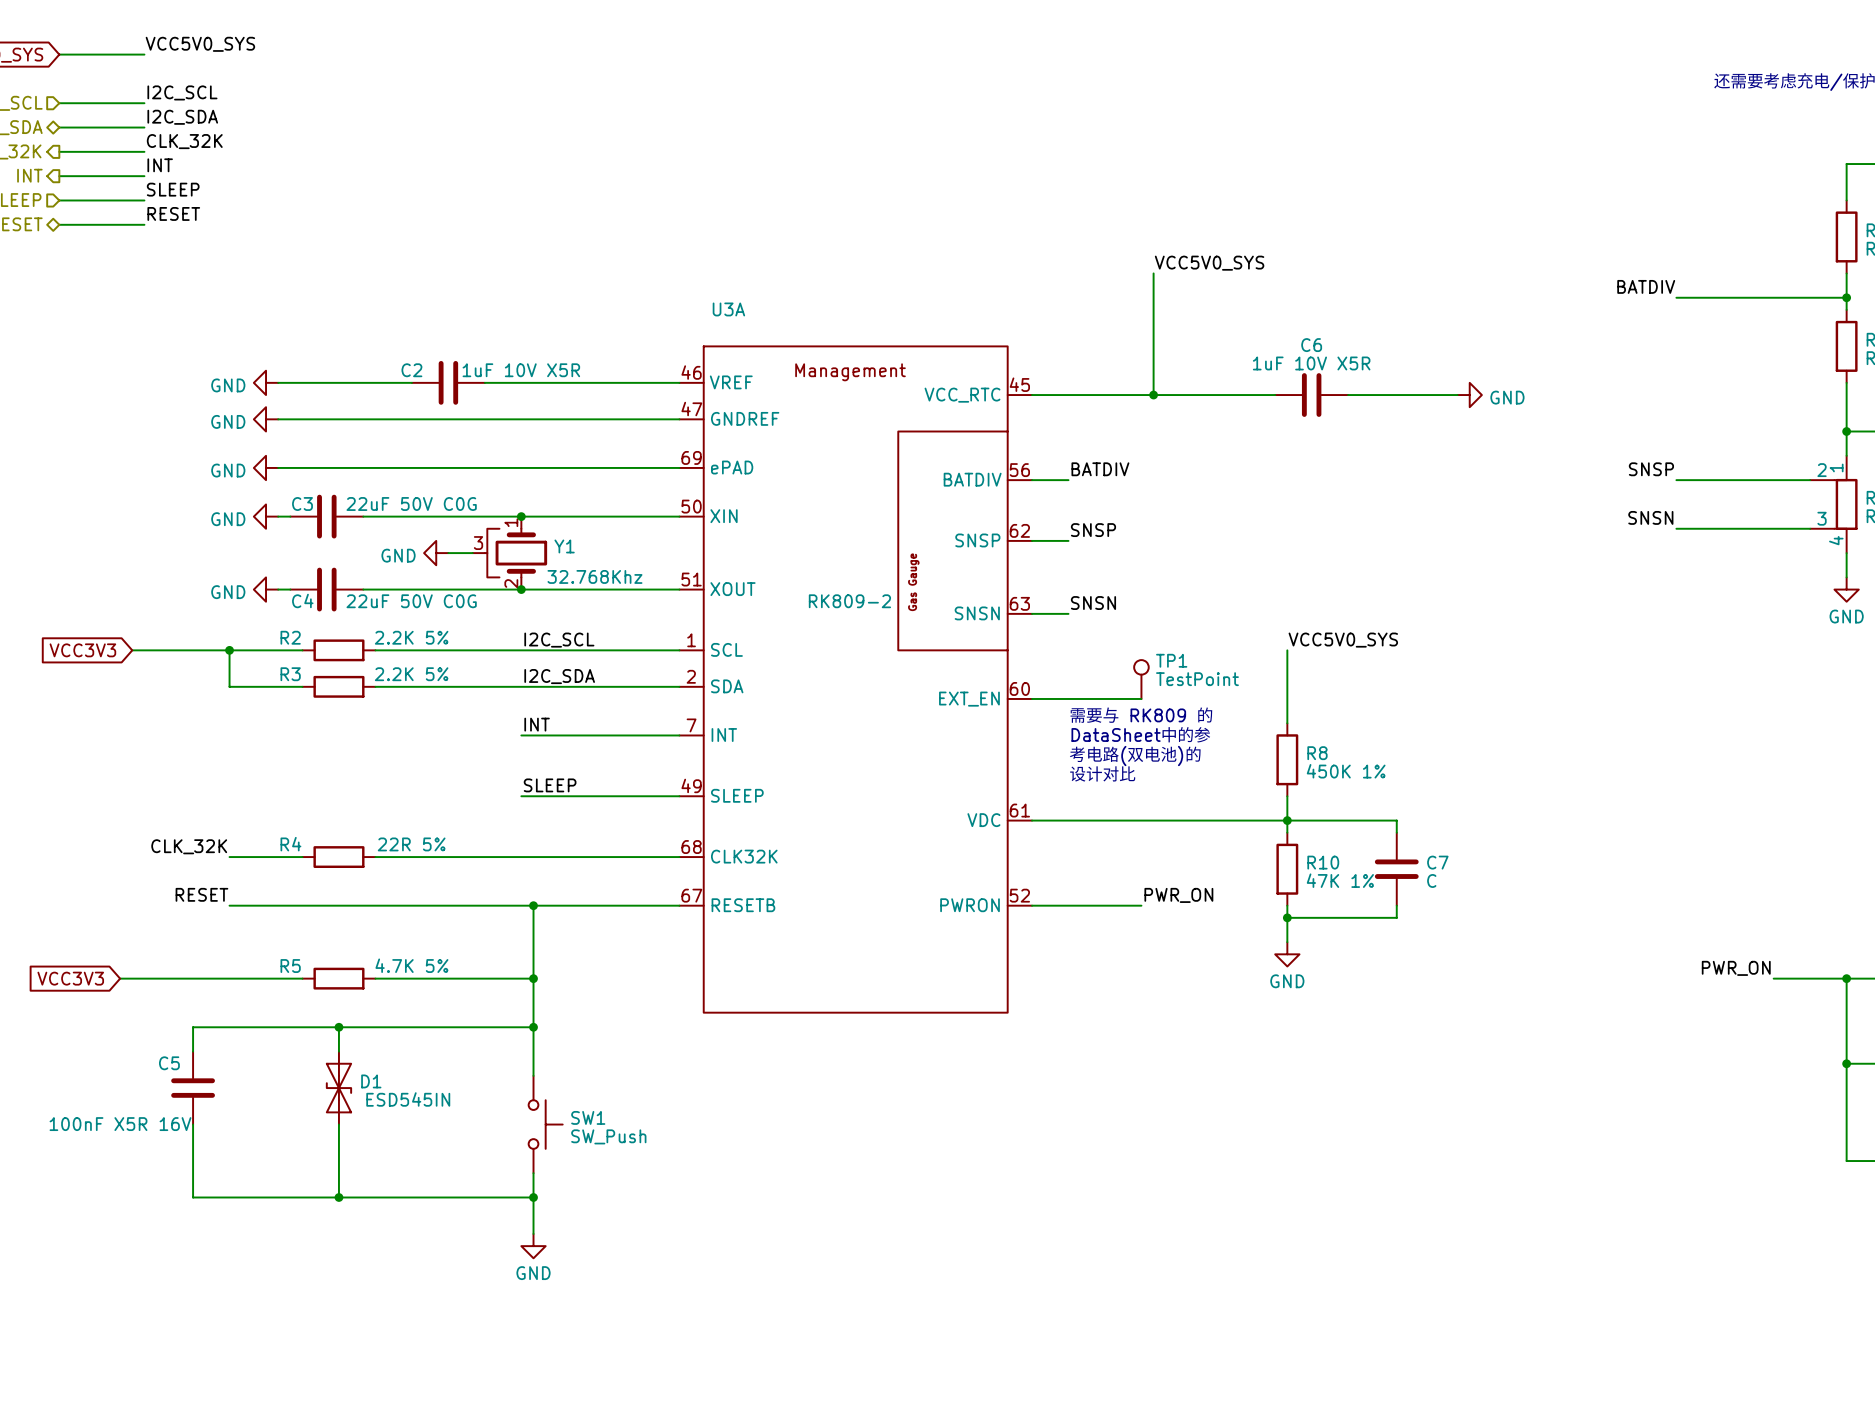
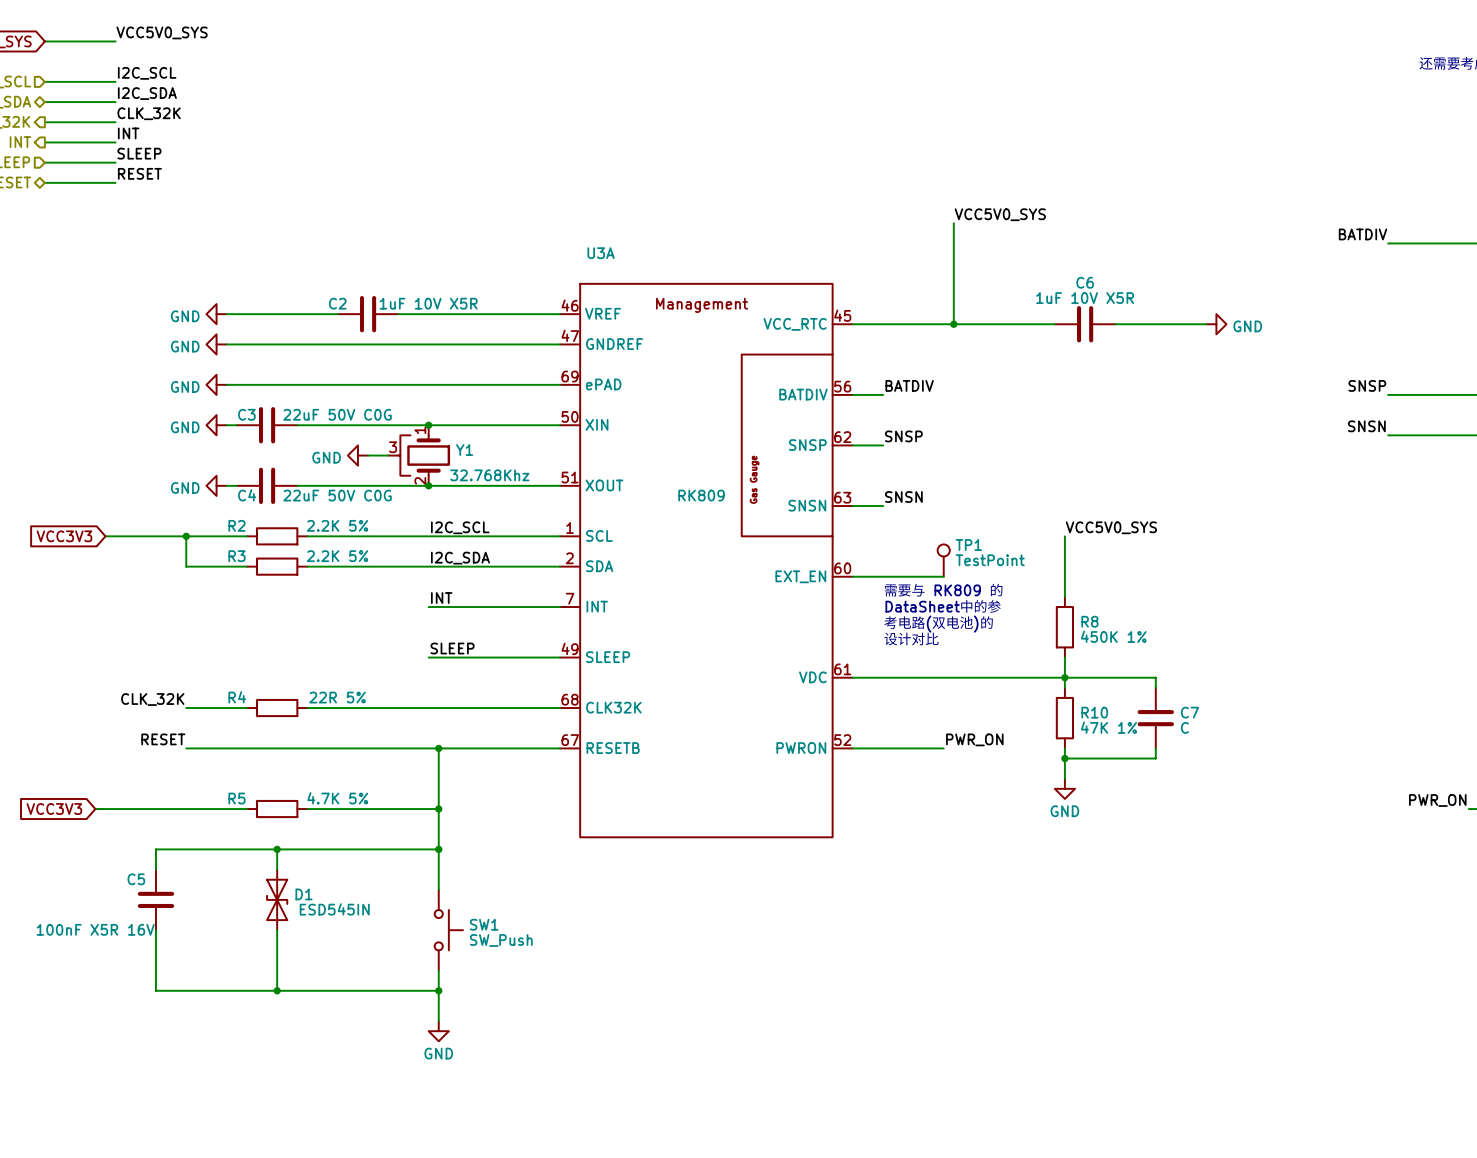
U3A value: RK809-2 (849, 601) -> RK809 (701, 495)

